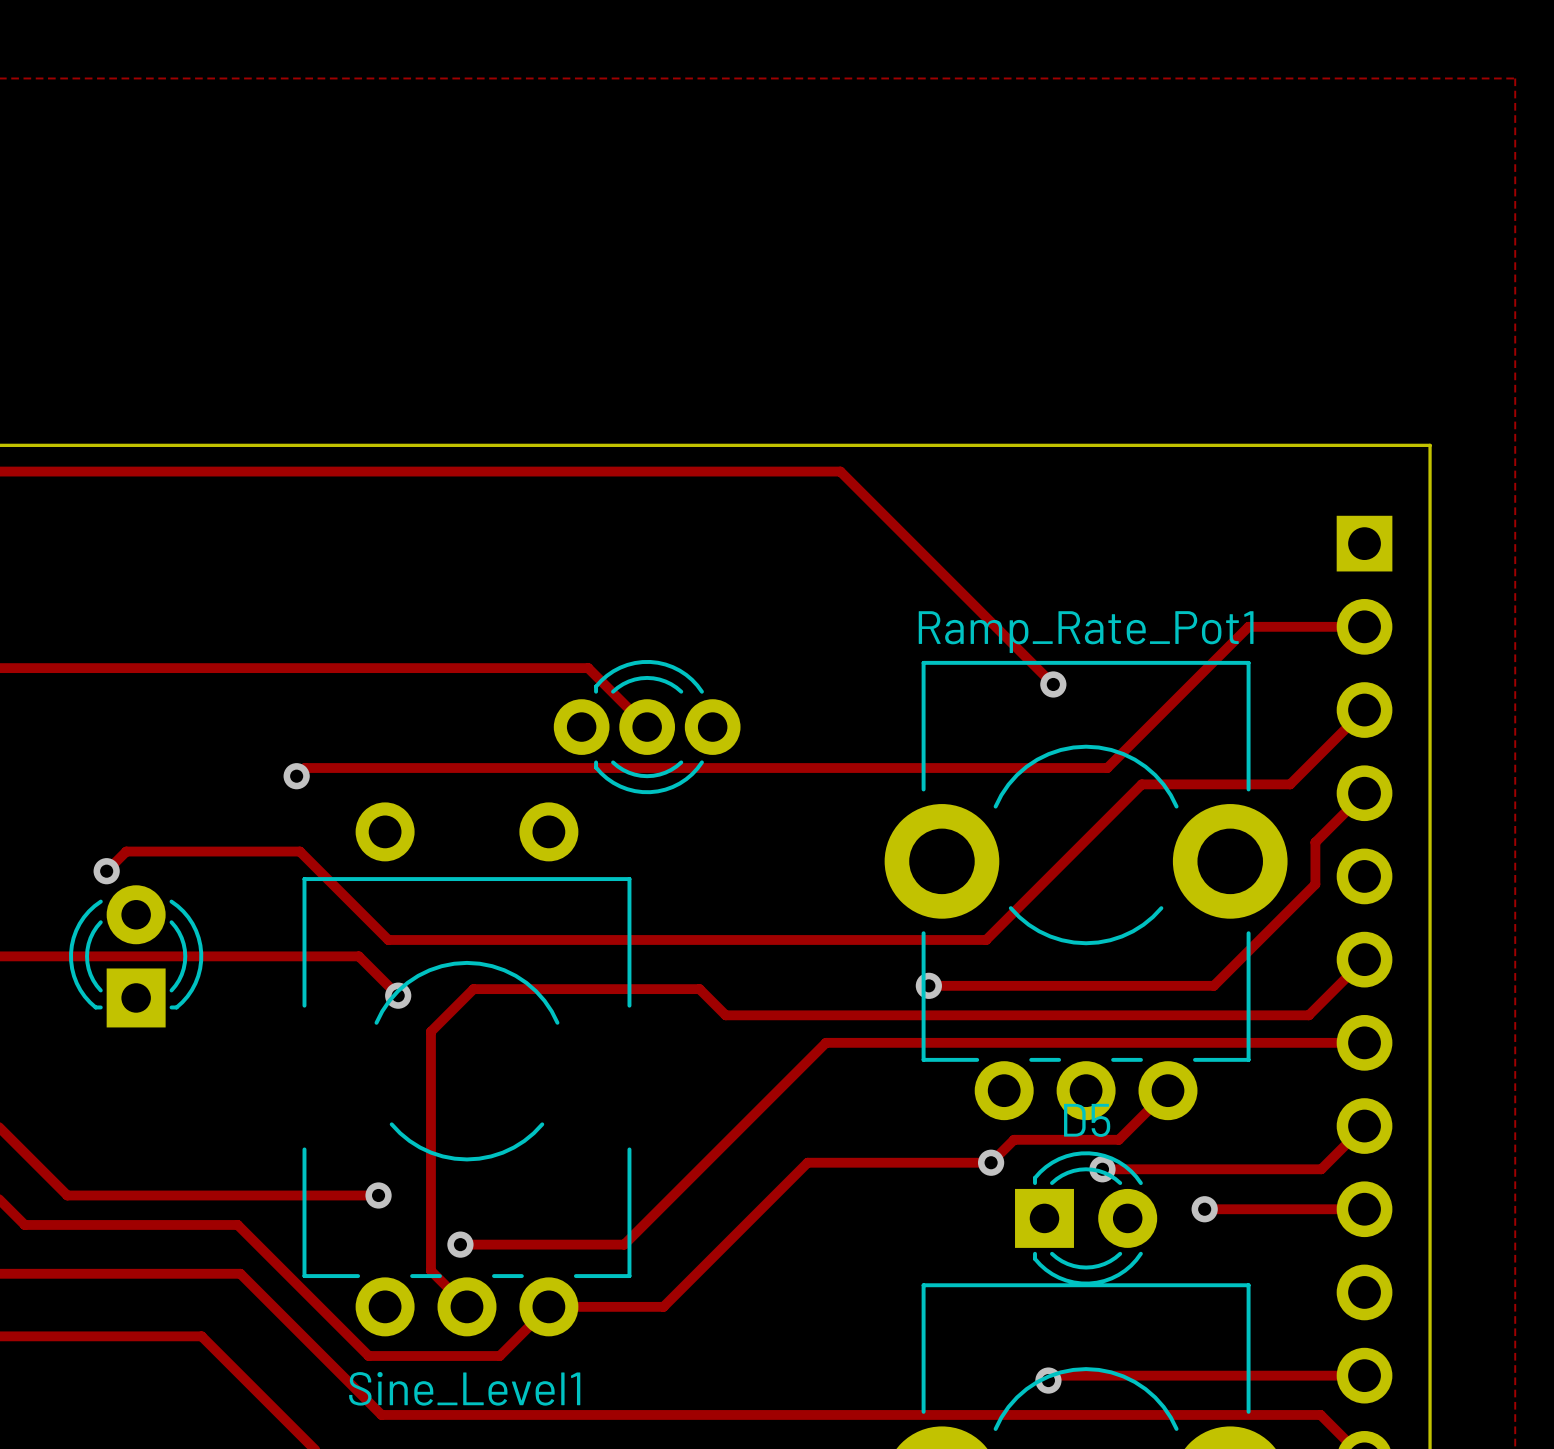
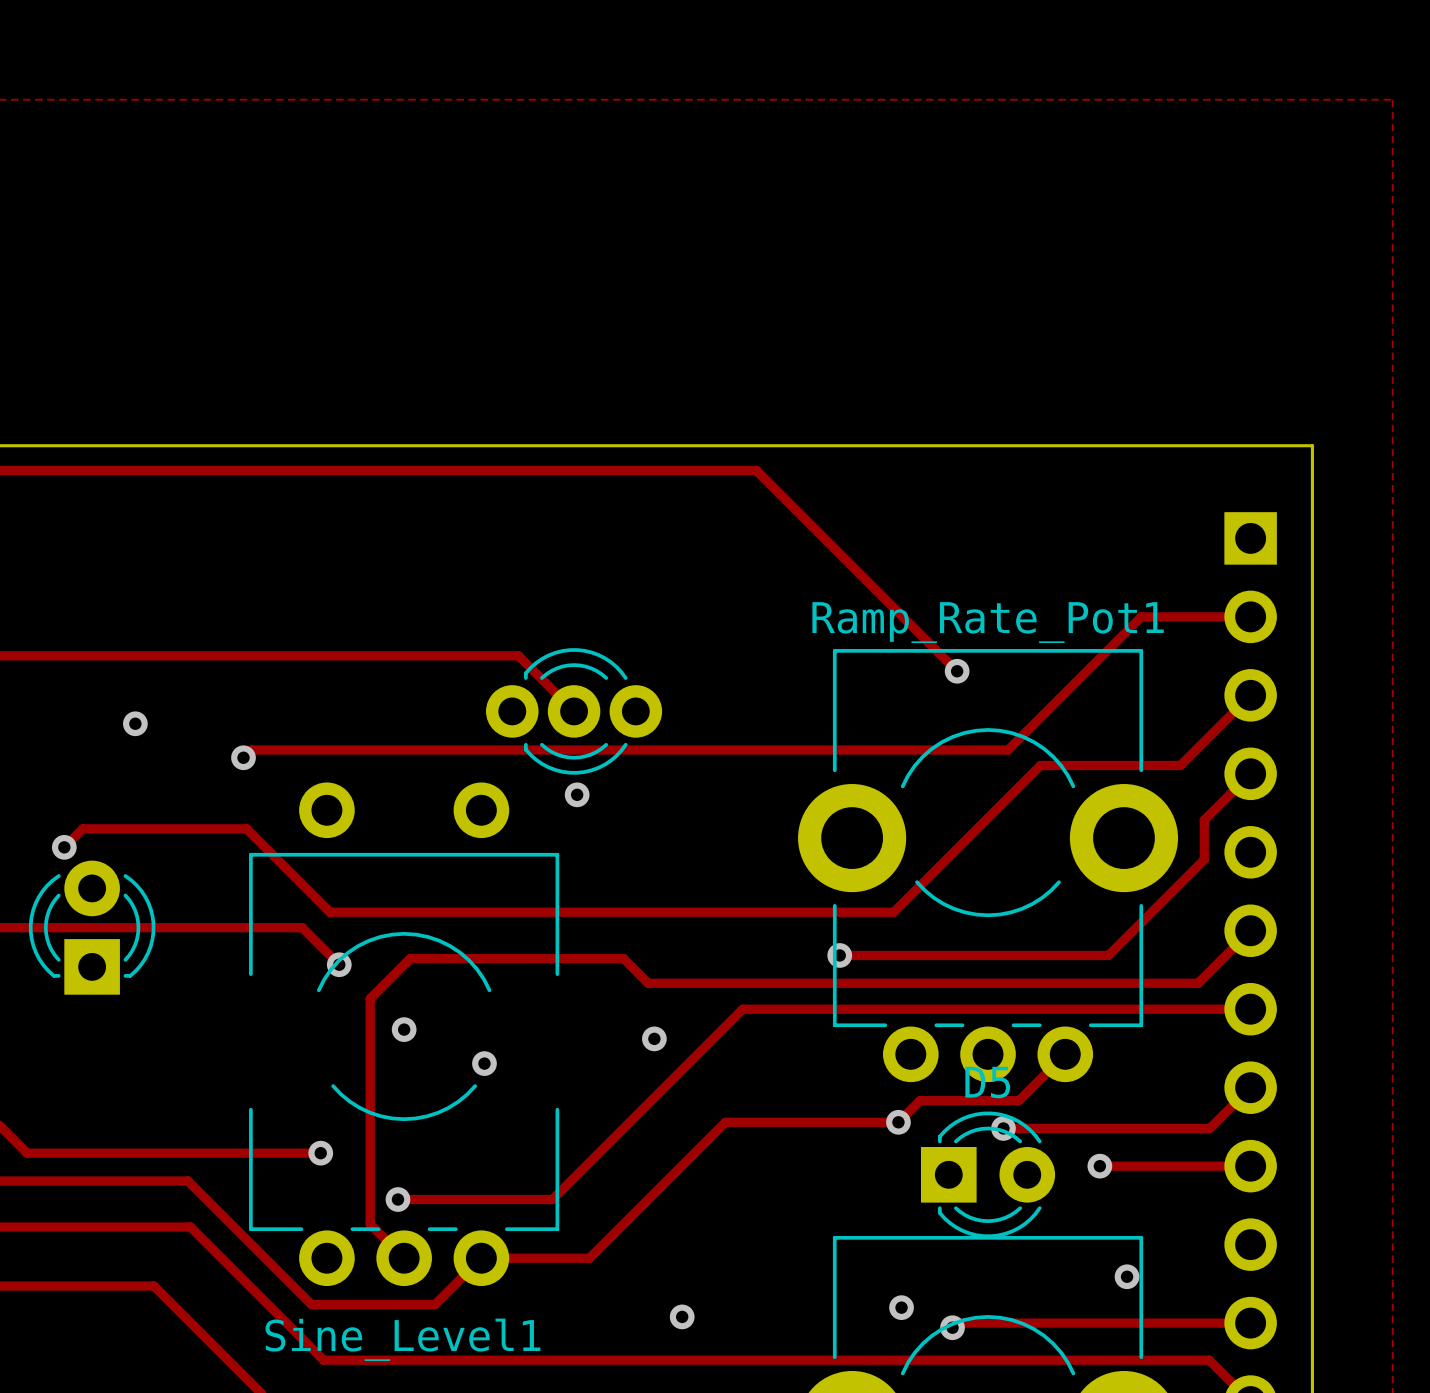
via: none -> (135, 723)
via: none -> (577, 794)
via: none -> (404, 1029)
via: none -> (654, 1038)
via: none -> (484, 1063)
via: none -> (1127, 1276)
via: none -> (901, 1307)
via: none -> (682, 1316)

